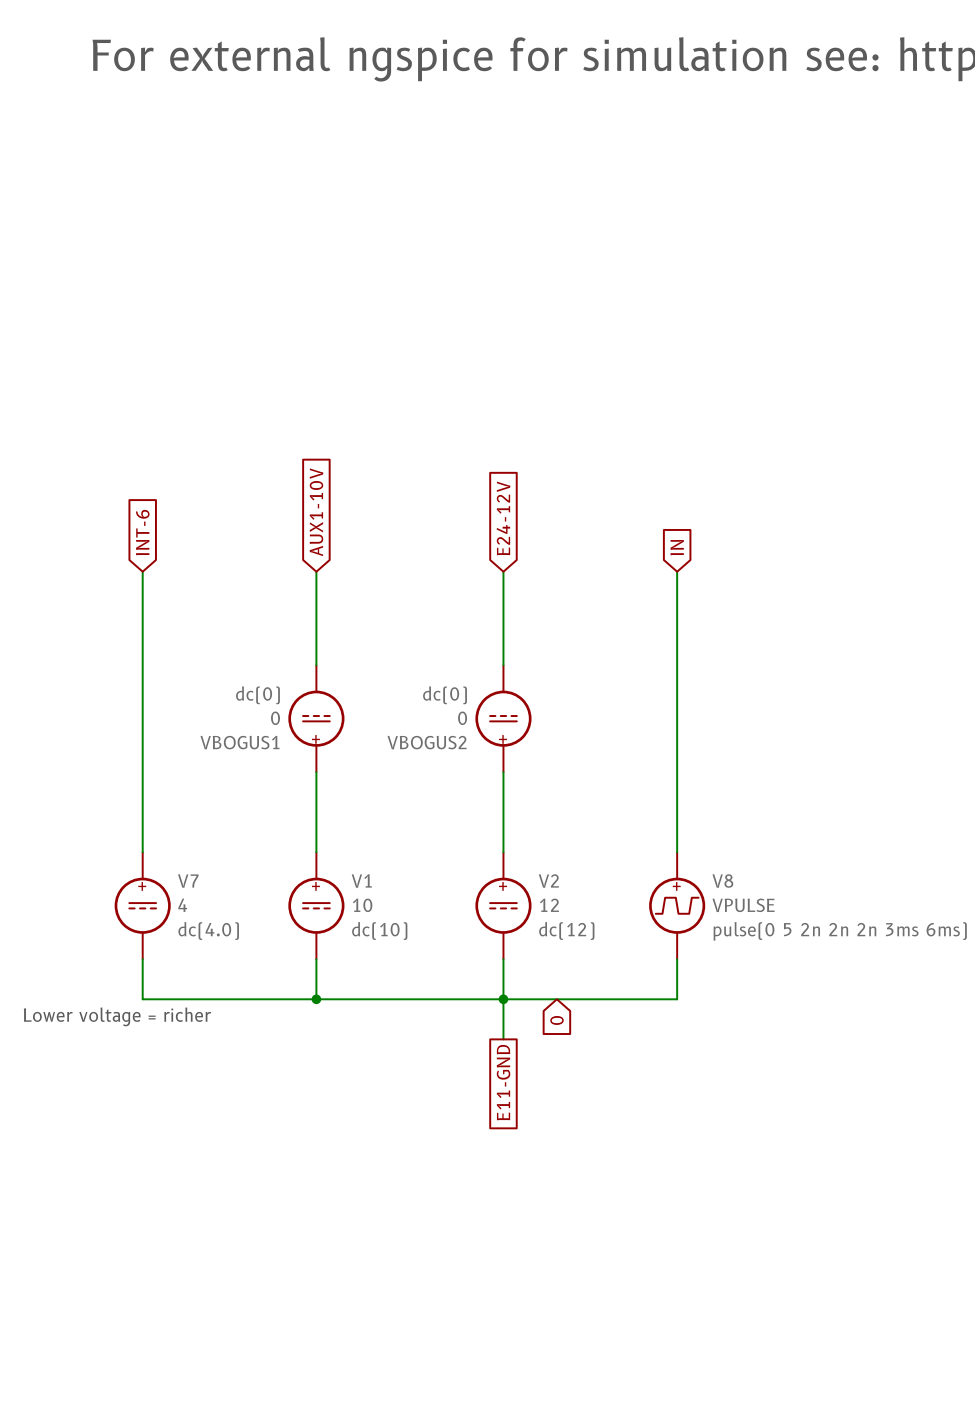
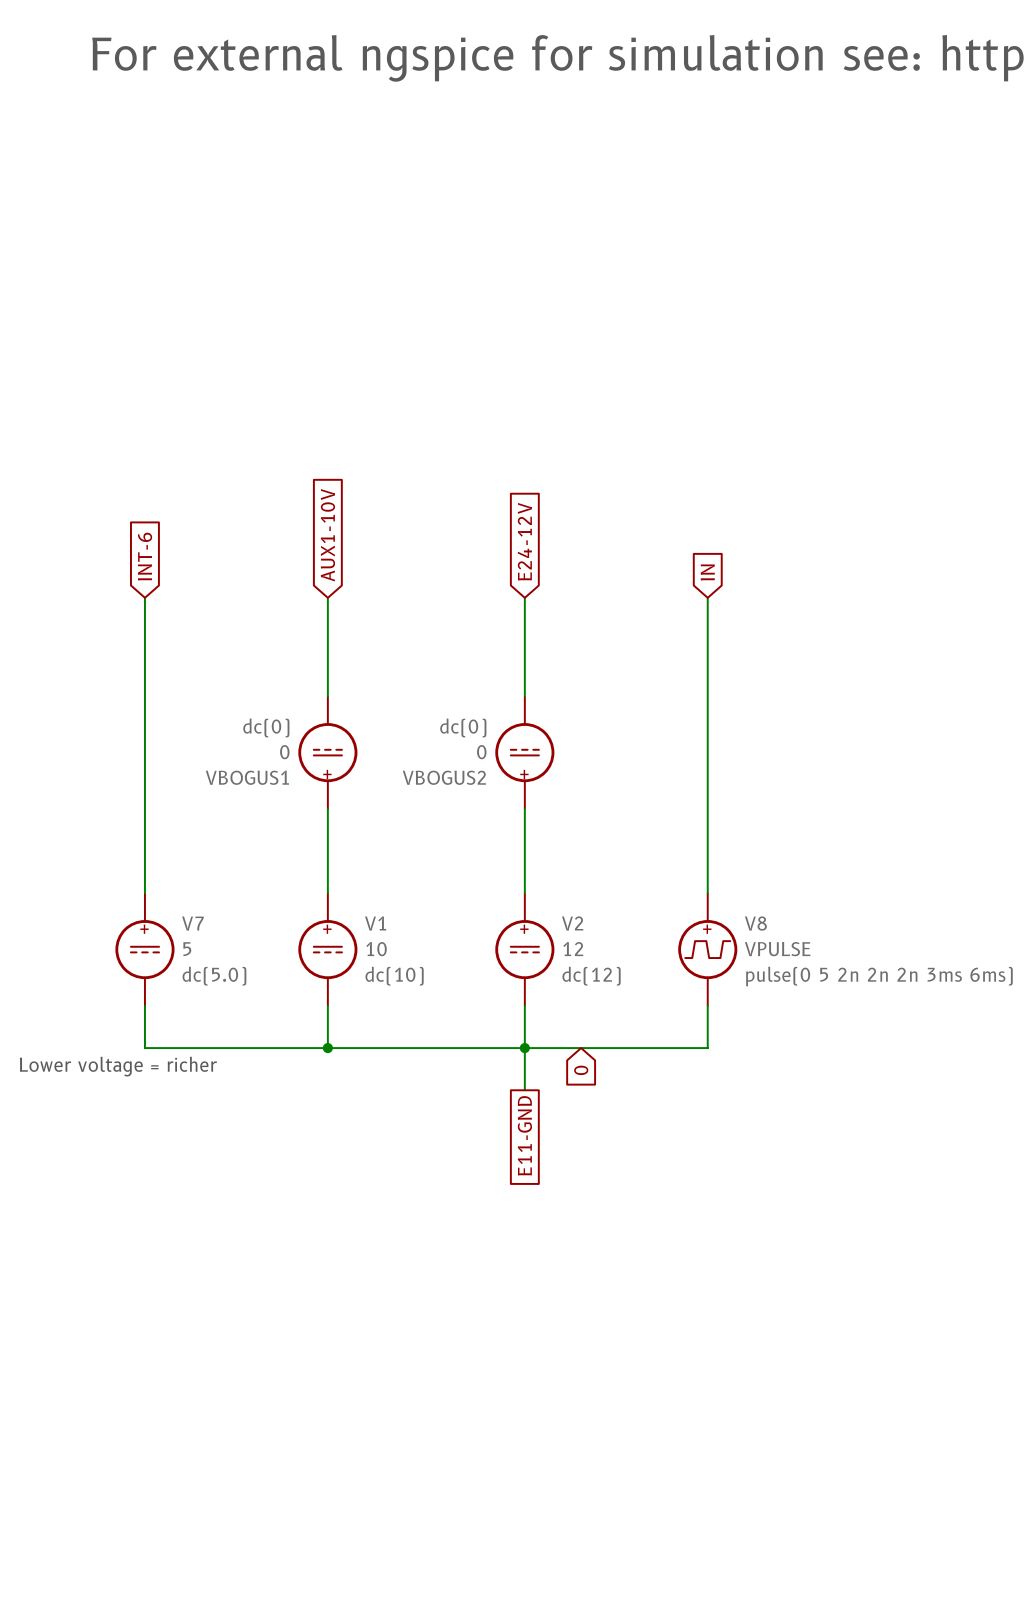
V7 value: 4 (182, 905) -> 5 (187, 949)
V7 text: dc(4.0) (208, 930) -> dc(5.0) (214, 976)

